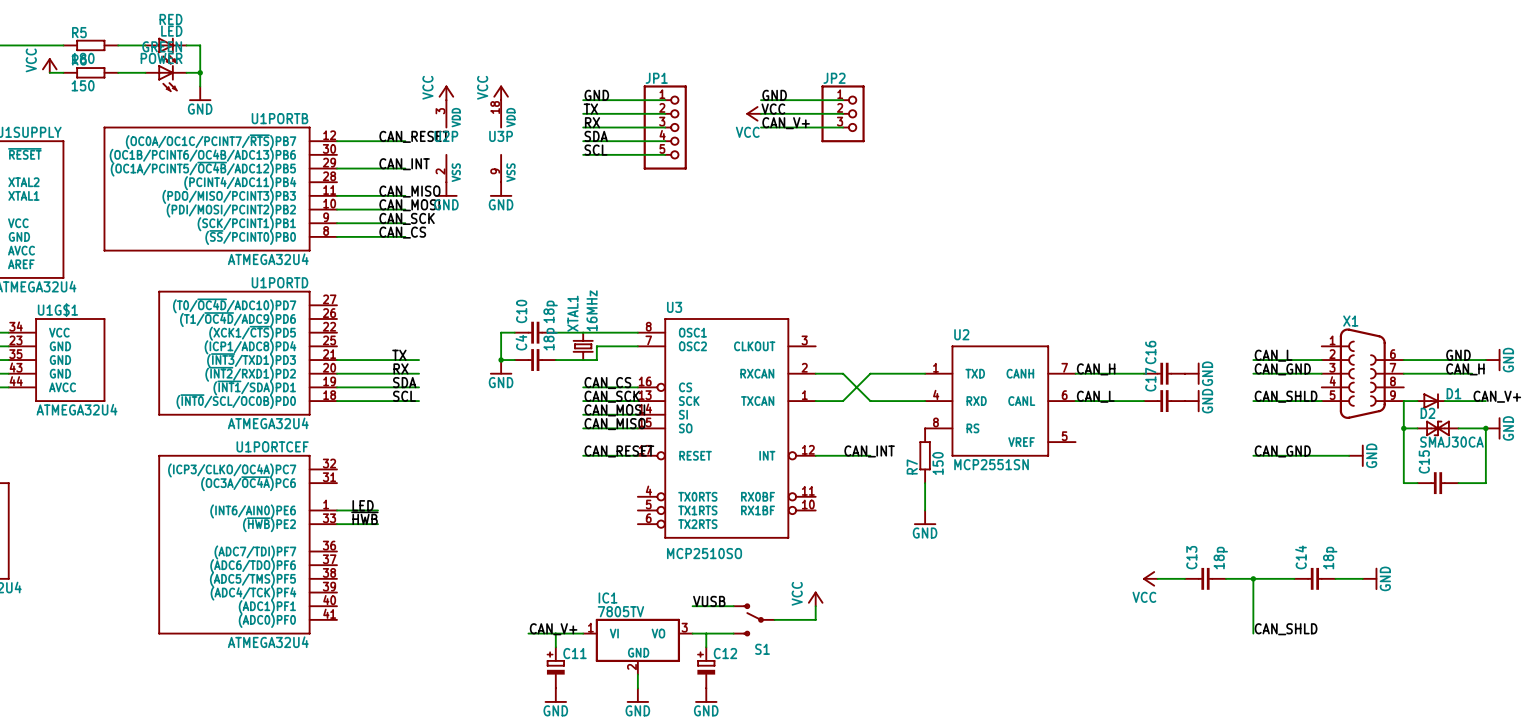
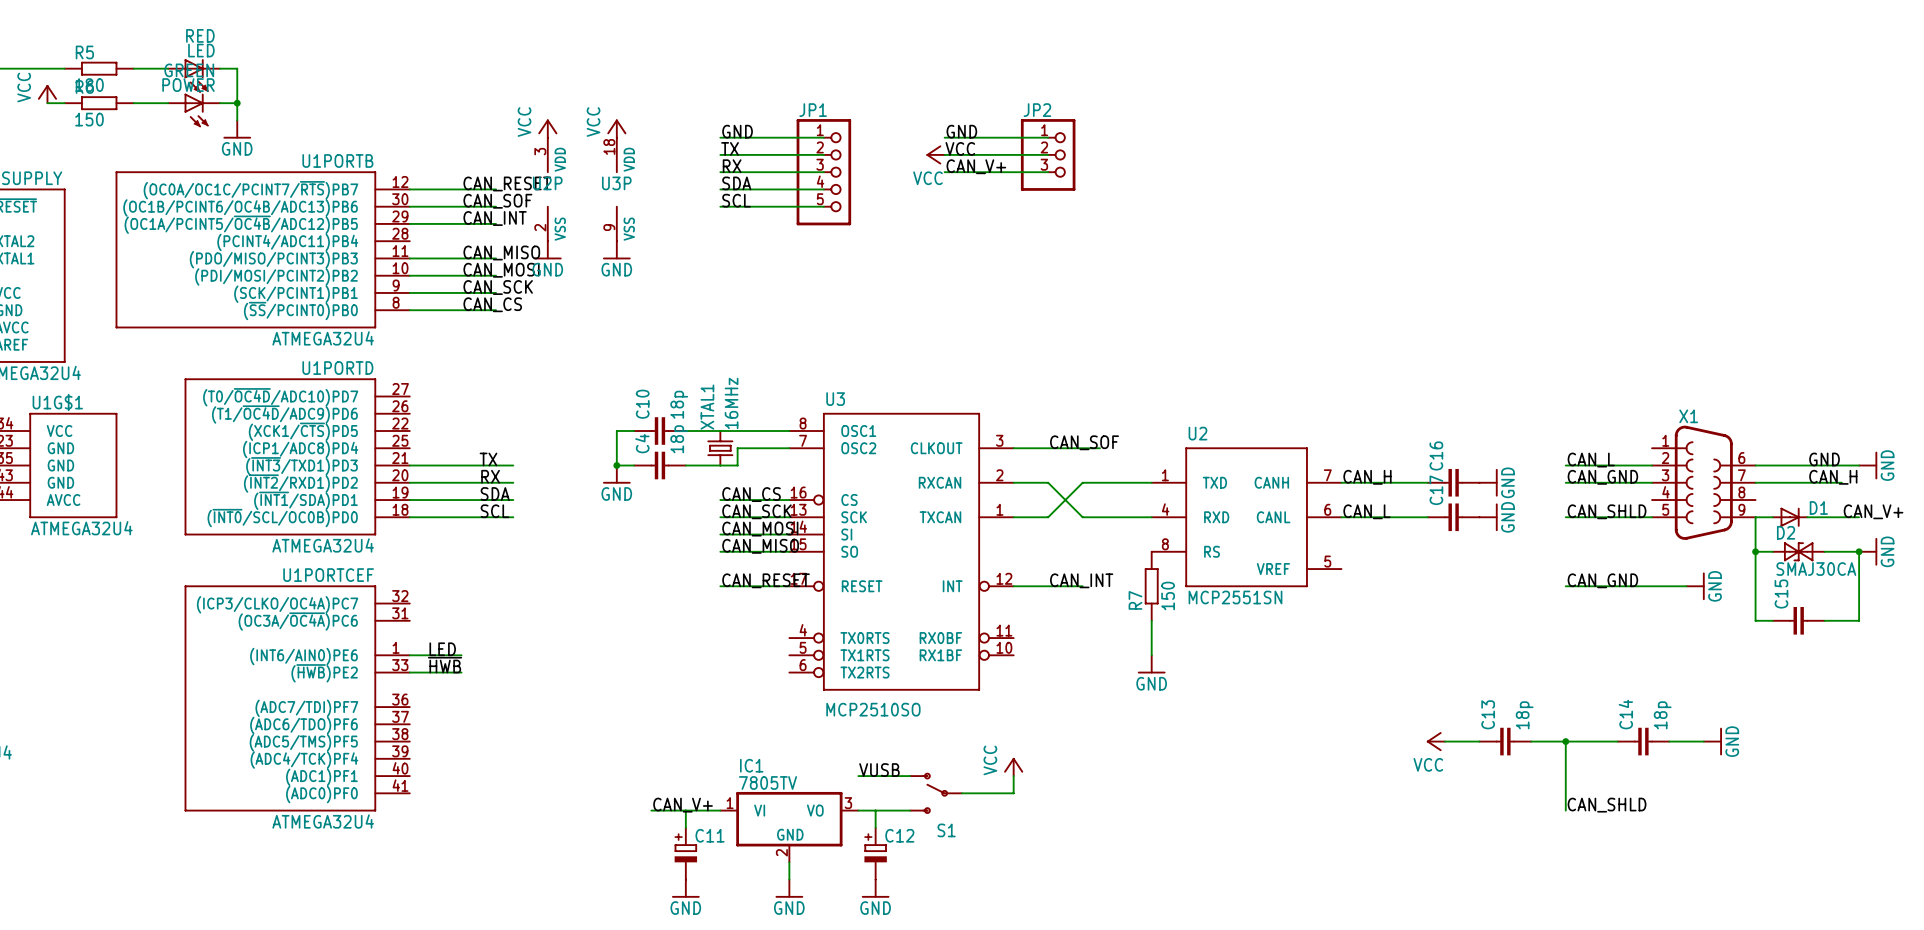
label: none -> CAN_SOF (497, 201)
wire: none -> (409, 206) (496, 206)
label: none -> CAN_SOF (1084, 442)
wire: none -> (1013, 448) (1099, 448)

